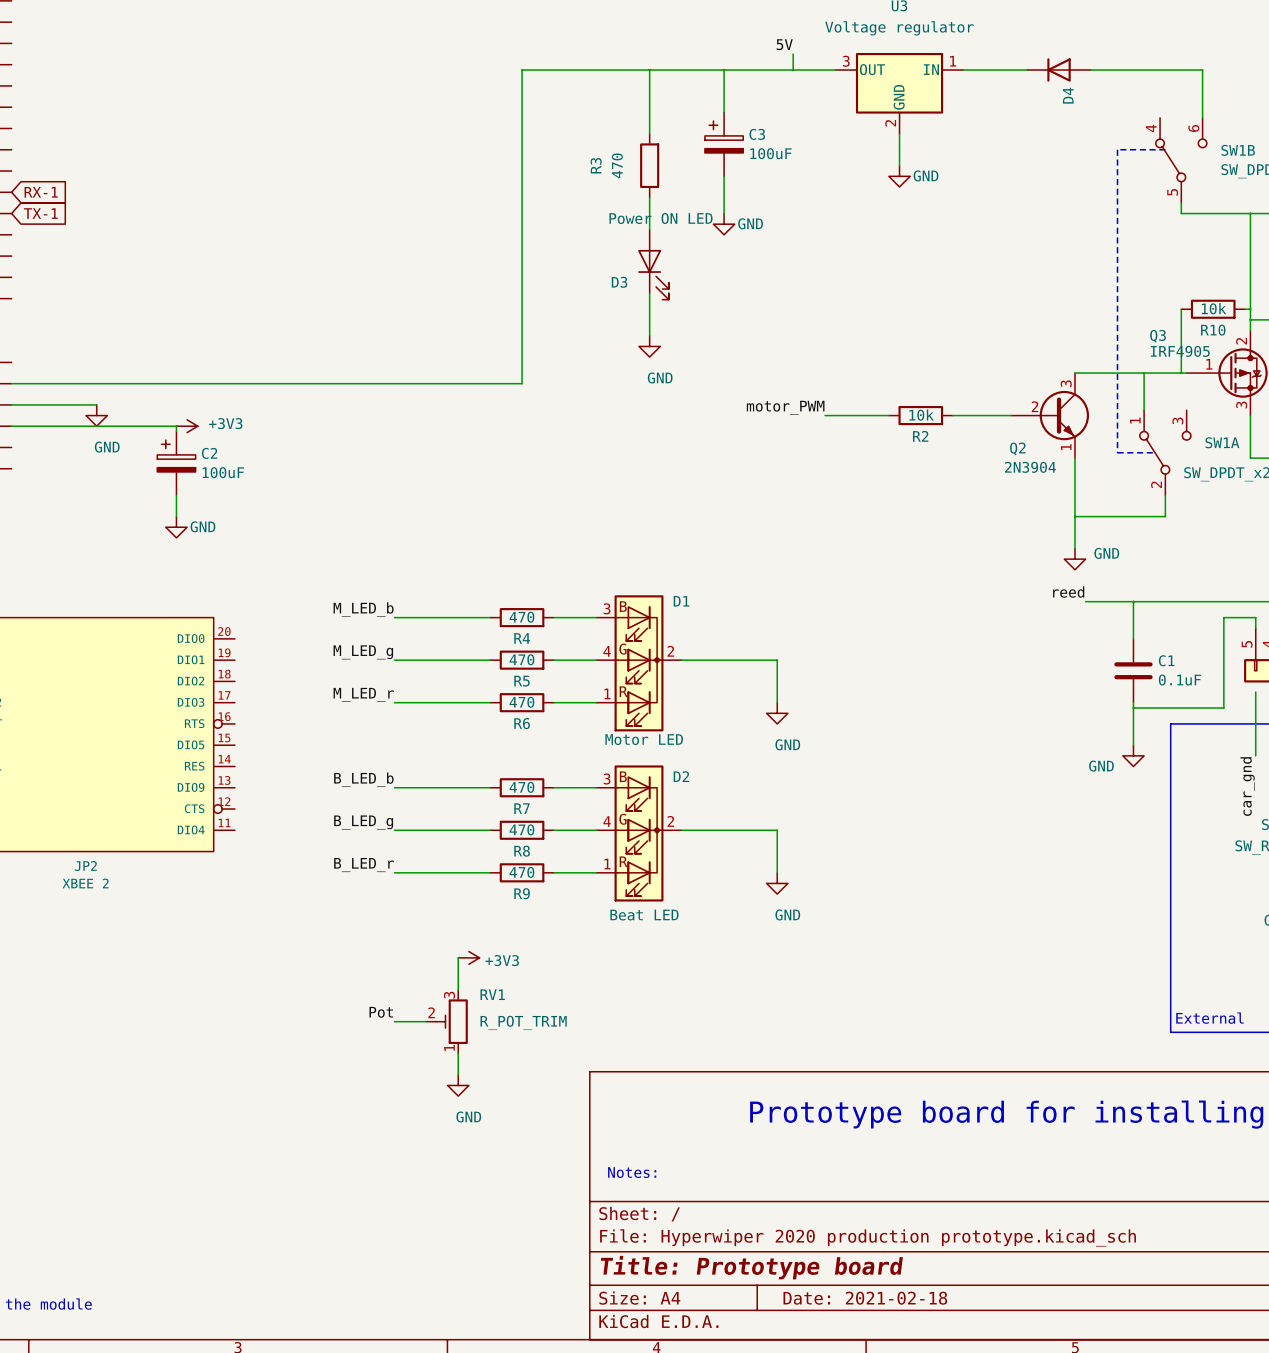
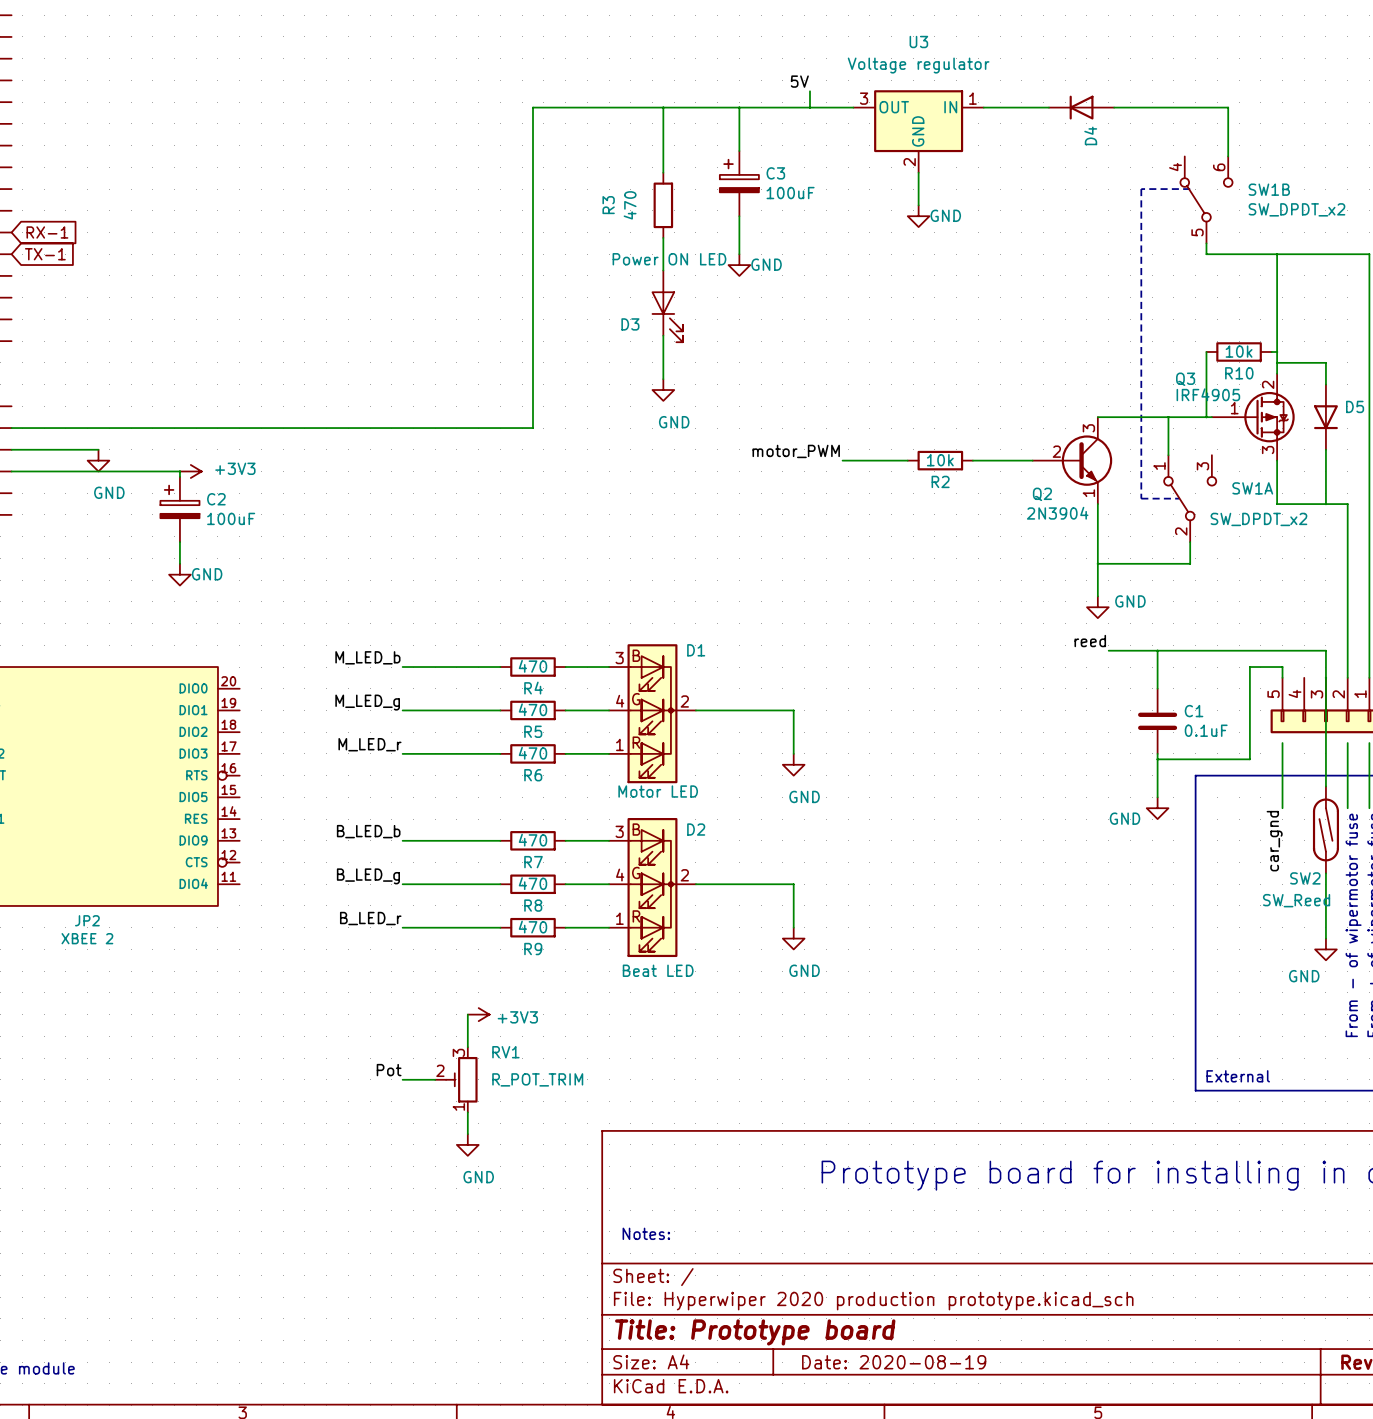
title block: Date: 2021-02-18 (865, 1298) -> Date: 2020-08-19 (894, 1362)

